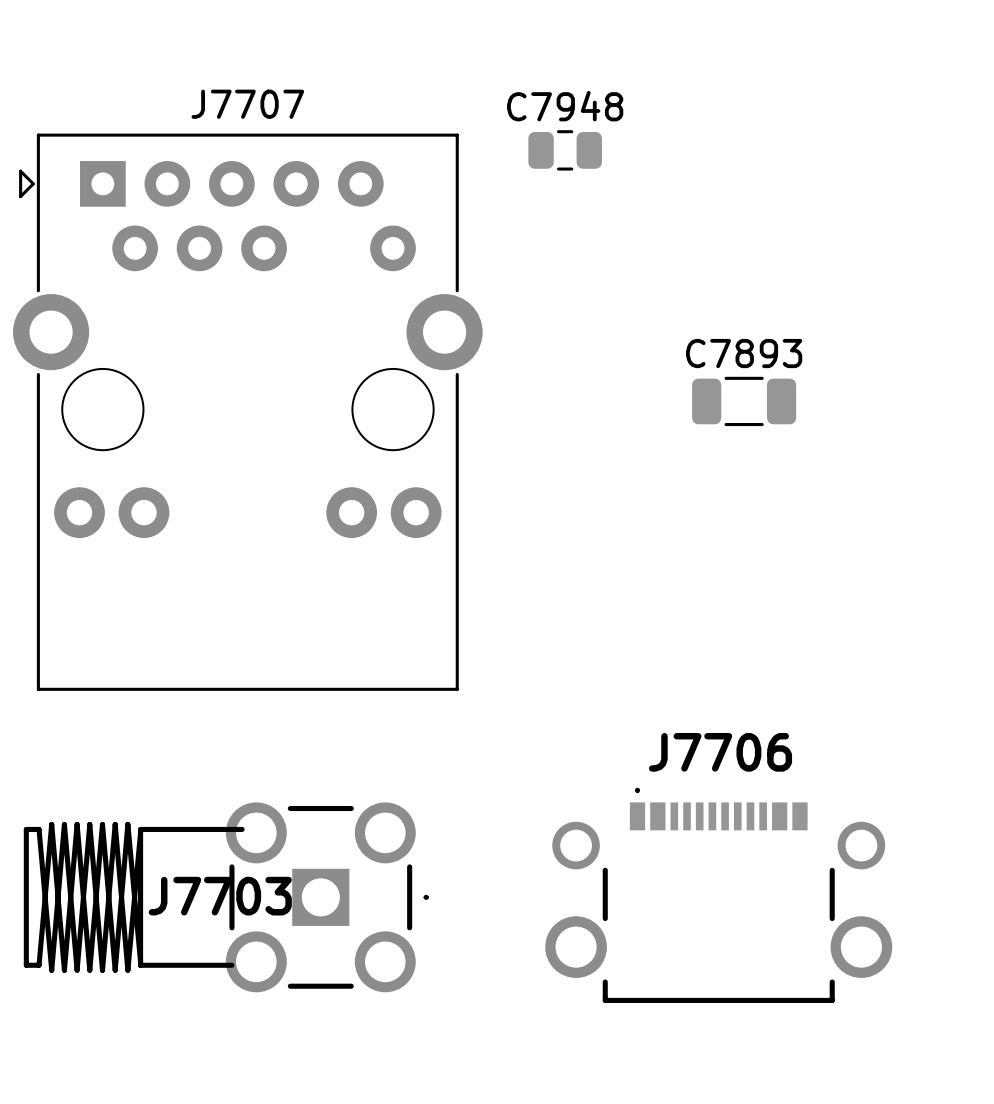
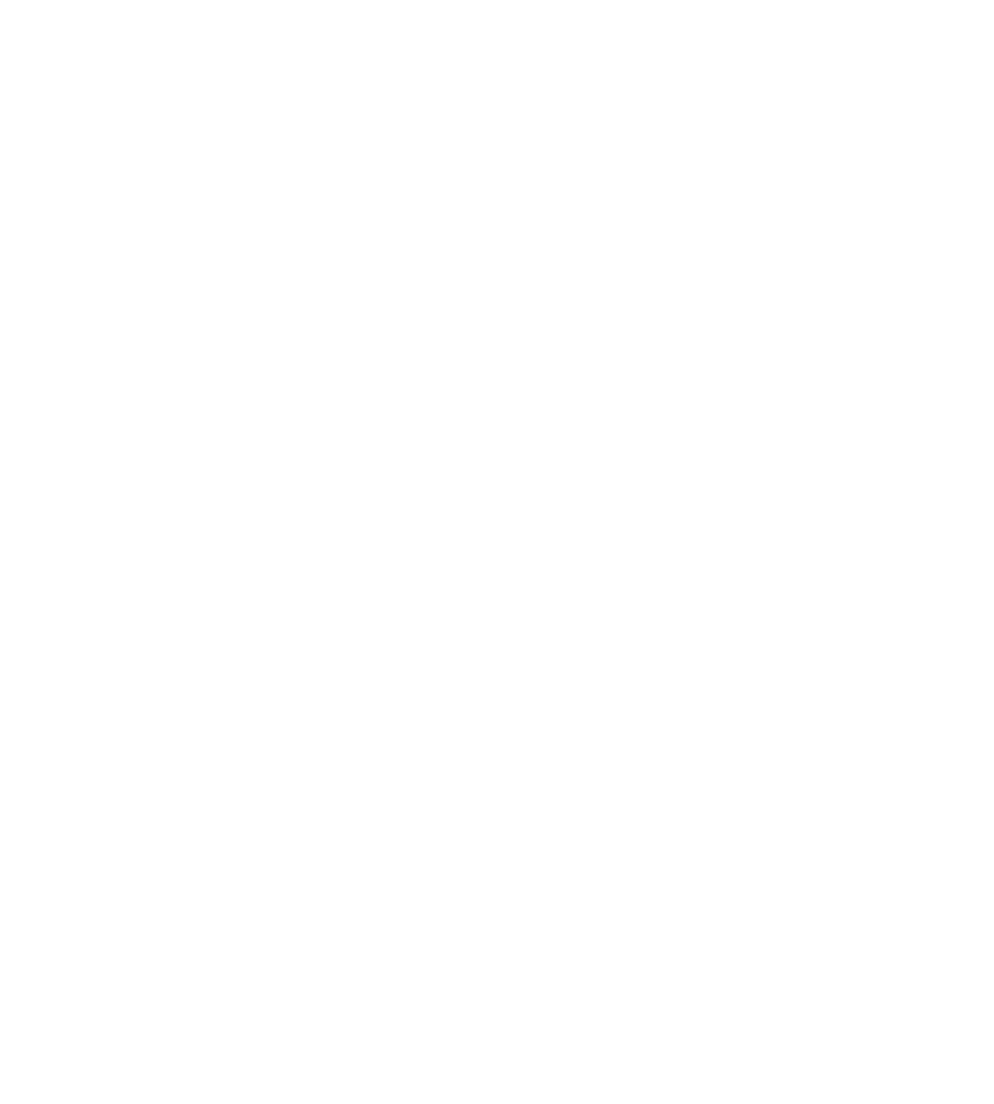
C7948: (565, 150) -> none
C7893: (744, 401) -> none
J7707: (247, 412) -> none
J7706: (718, 895) -> none
J7703: (226, 897) -> none

